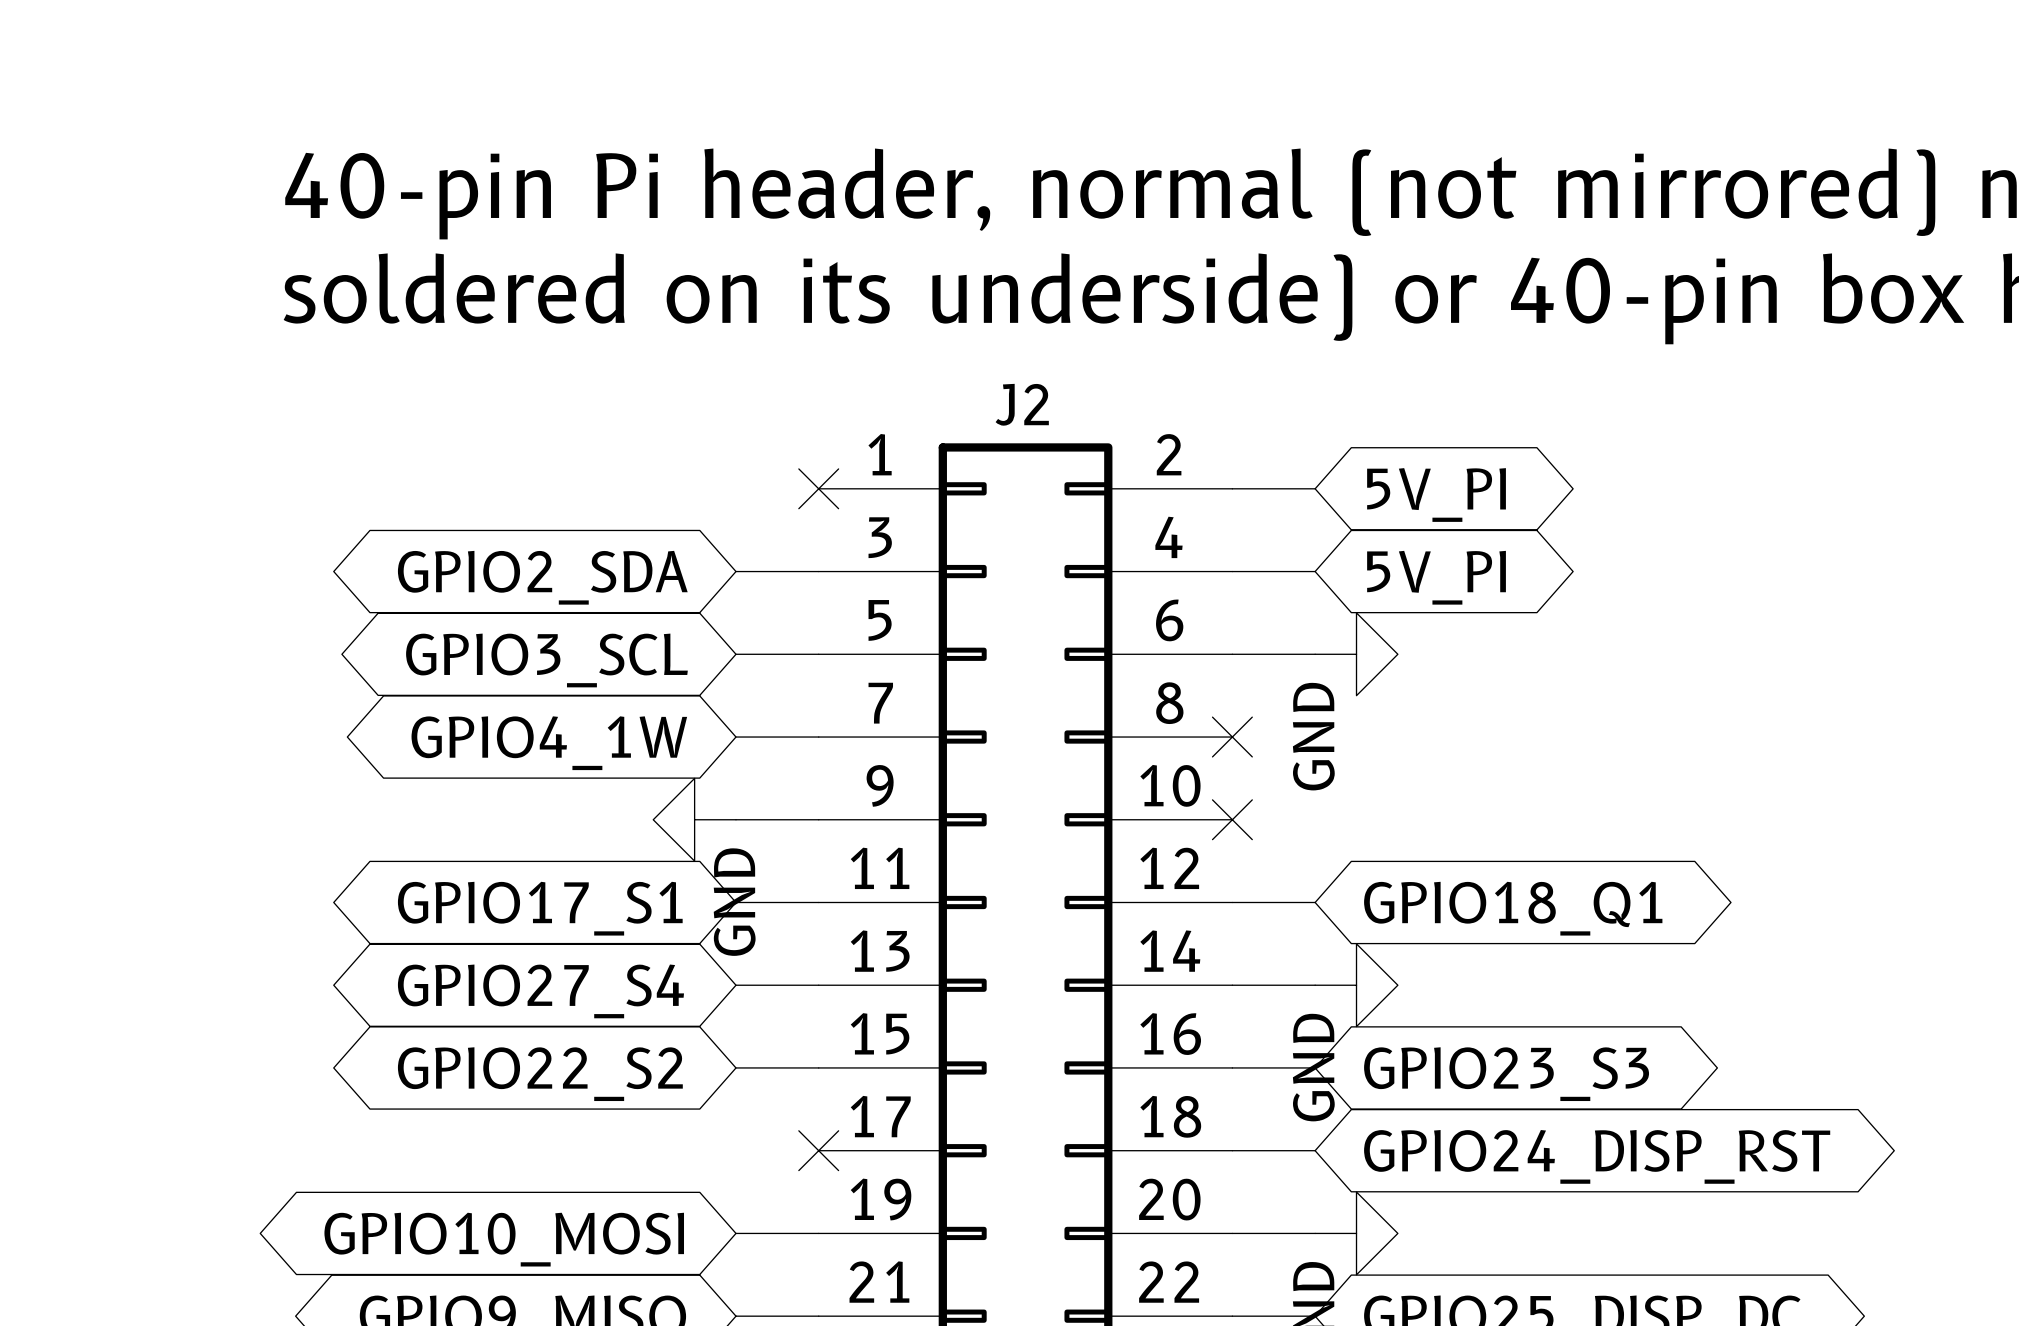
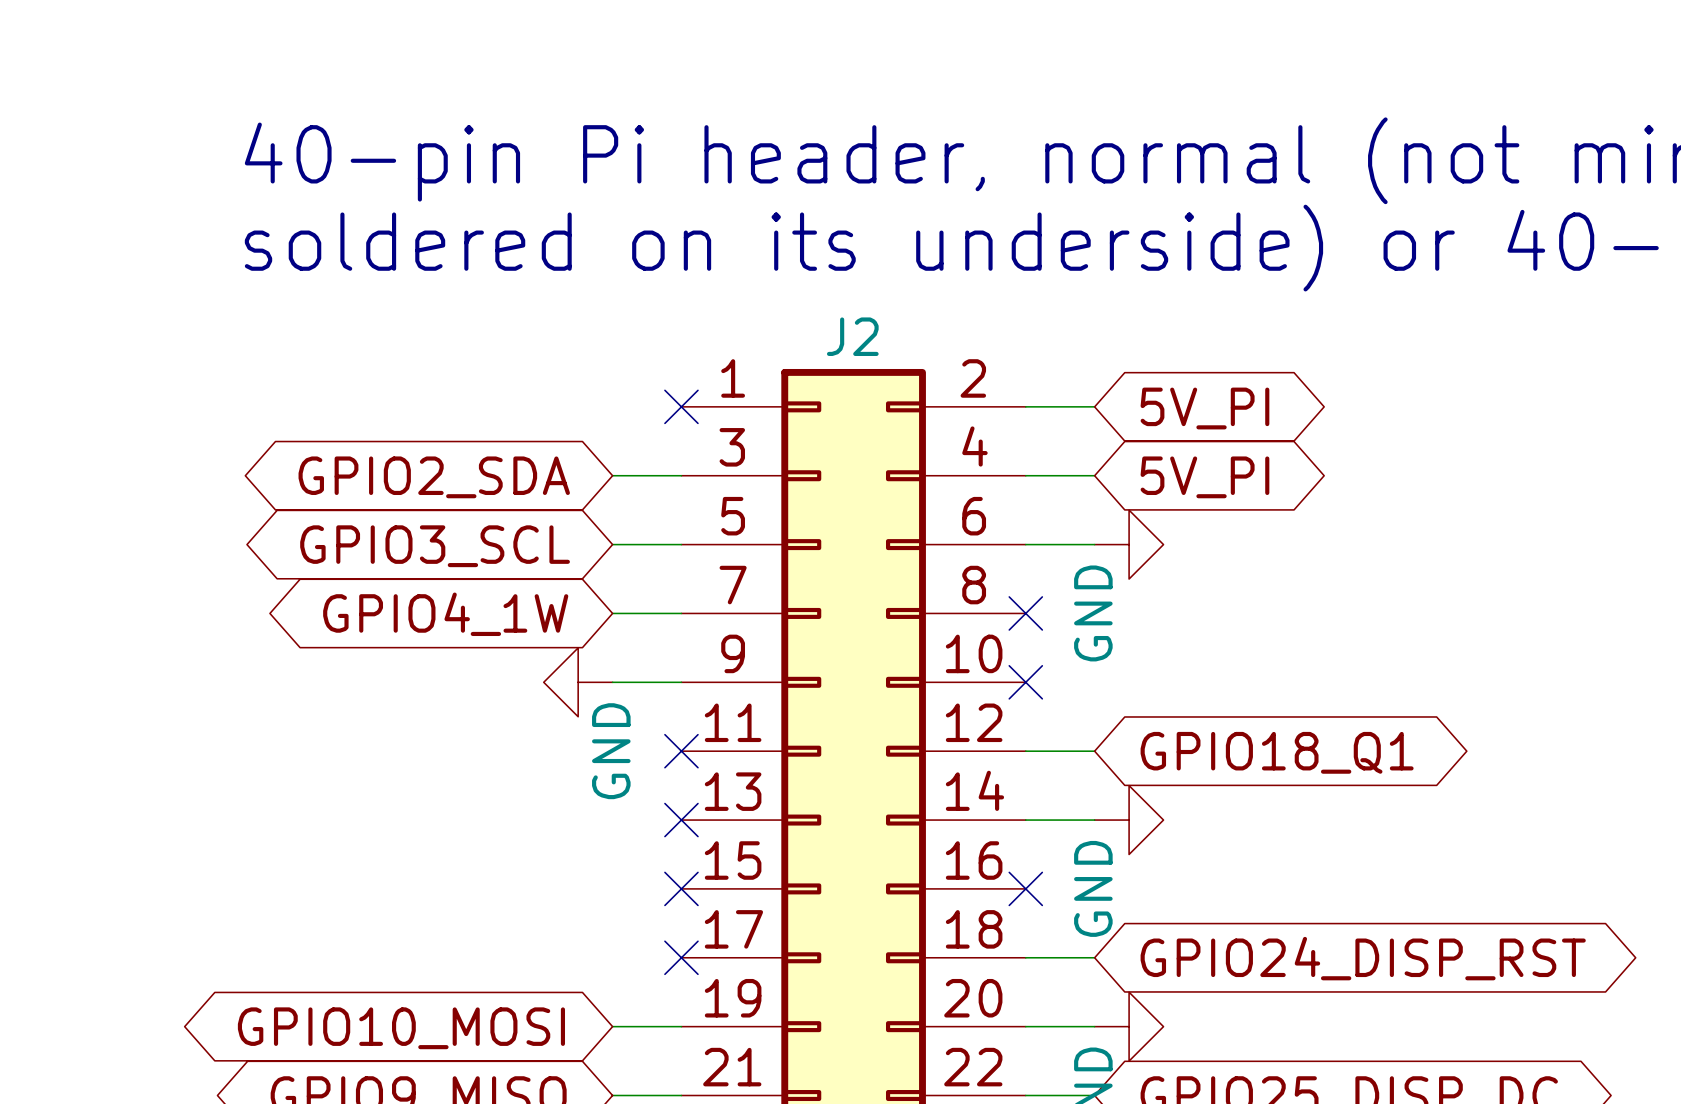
wire: (735, 902) (818, 902) -> none
no-connect mark: none -> (681, 751)
global label: GPIO17_S1 (540, 908) -> none
wire: (735, 985) (818, 985) -> none
no-connect mark: none -> (681, 820)
global label: GPIO27_S4 (540, 991) -> none
wire: (735, 1067) (818, 1067) -> none
no-connect mark: none -> (681, 888)
wire: (1232, 1067) (1315, 1067) -> none
no-connect mark: none -> (1025, 888)
global label: GPIO22_S2 (540, 1074) -> none
global label: GPIO23_S3 (1506, 1074) -> none

